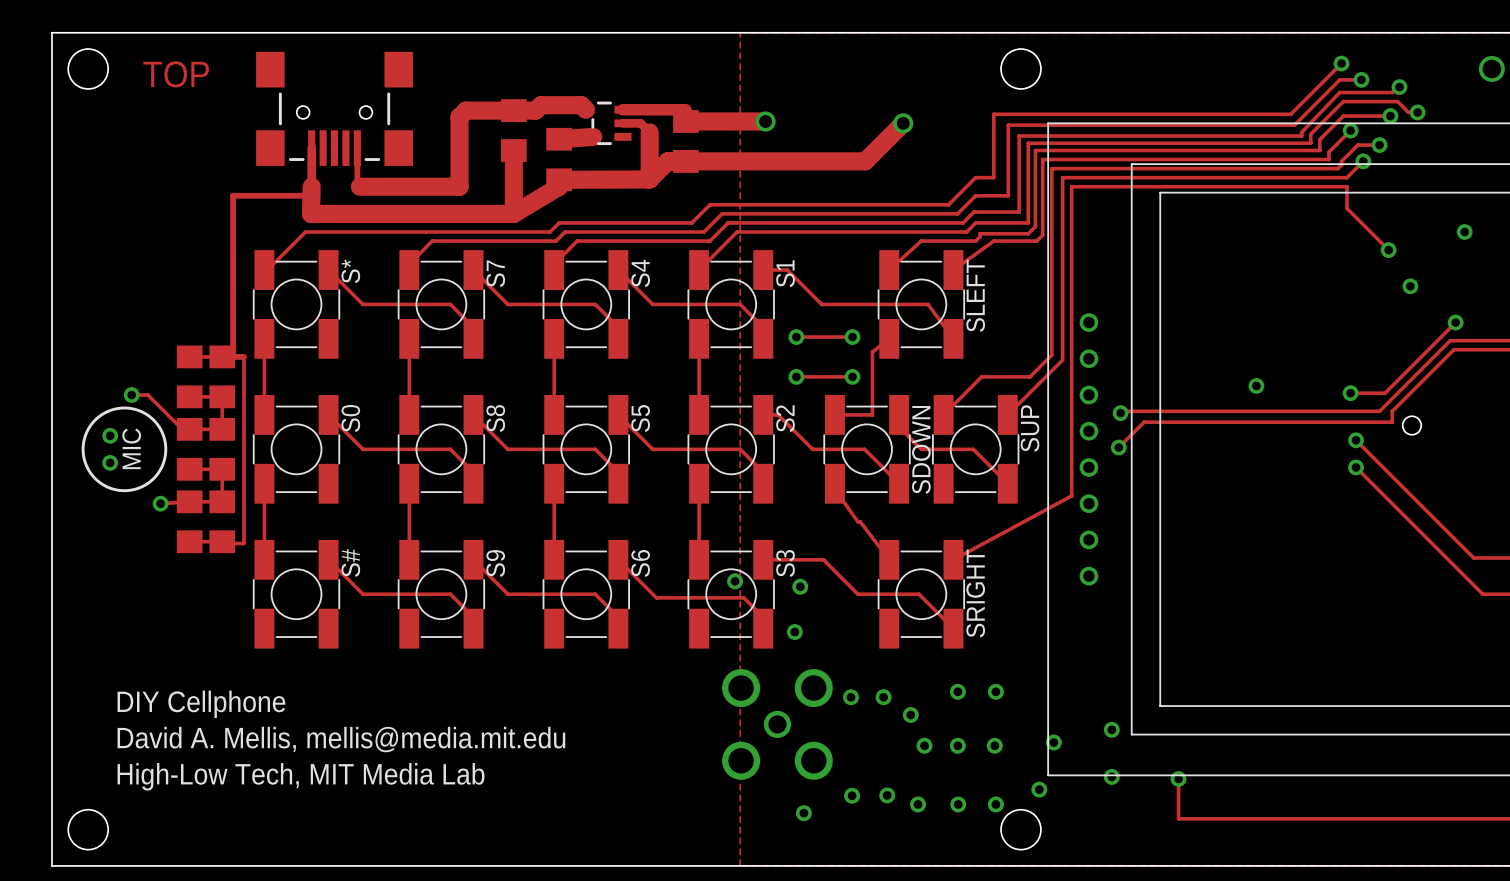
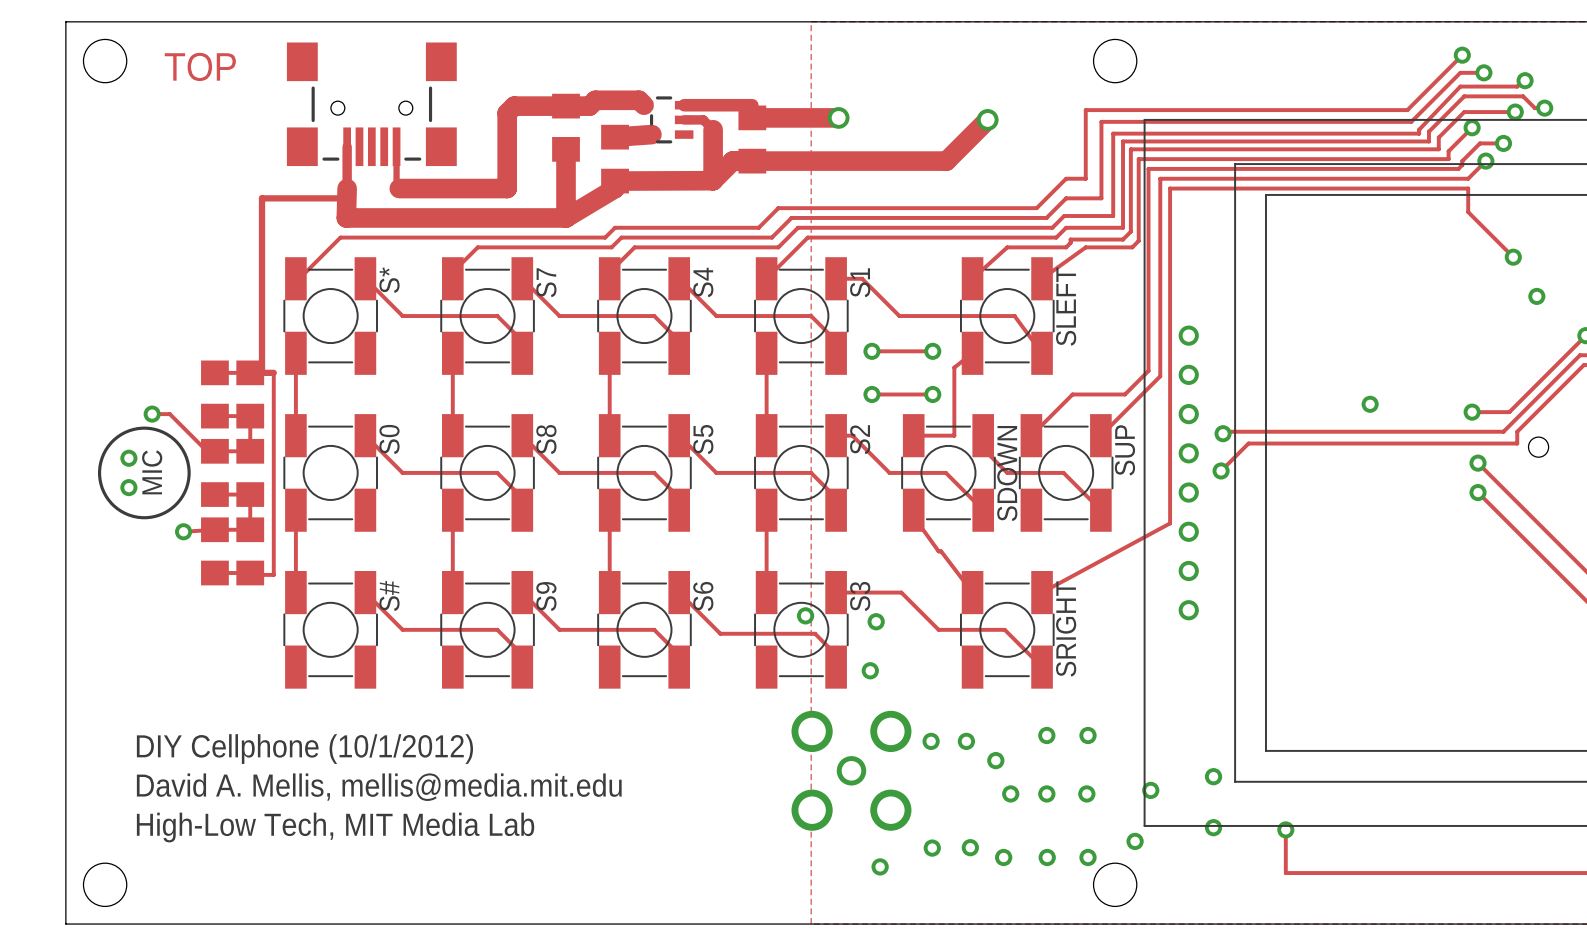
text: DIY Cellphone (201, 704) -> DIY Cellphone (10/1/2012) (304, 749)

